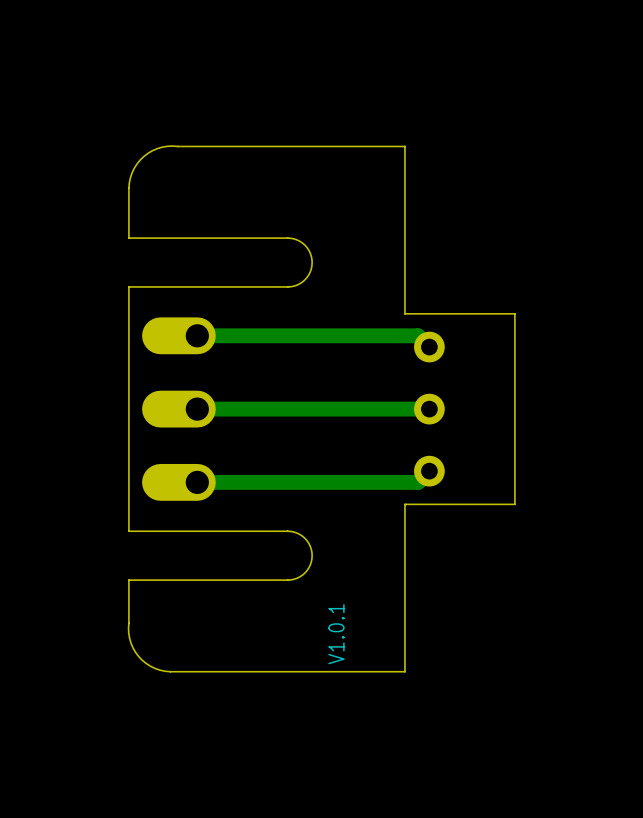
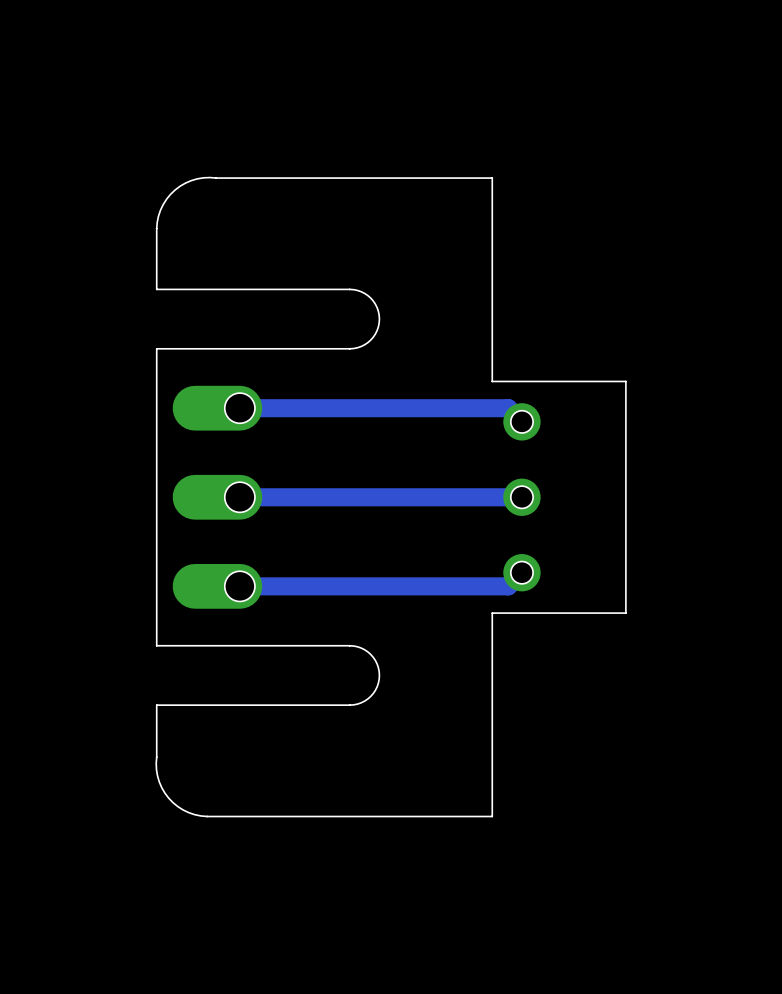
text: V1.0.1 (336, 634) -> none

